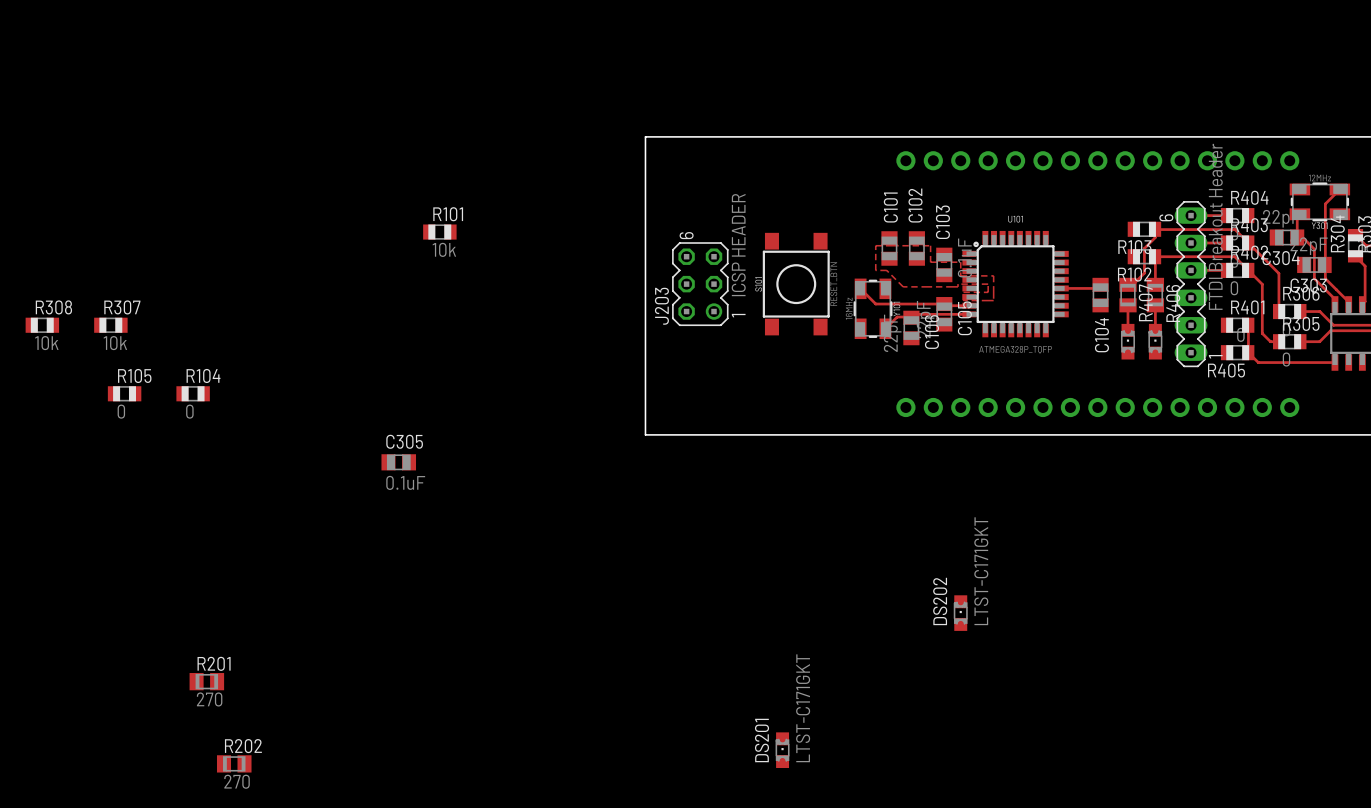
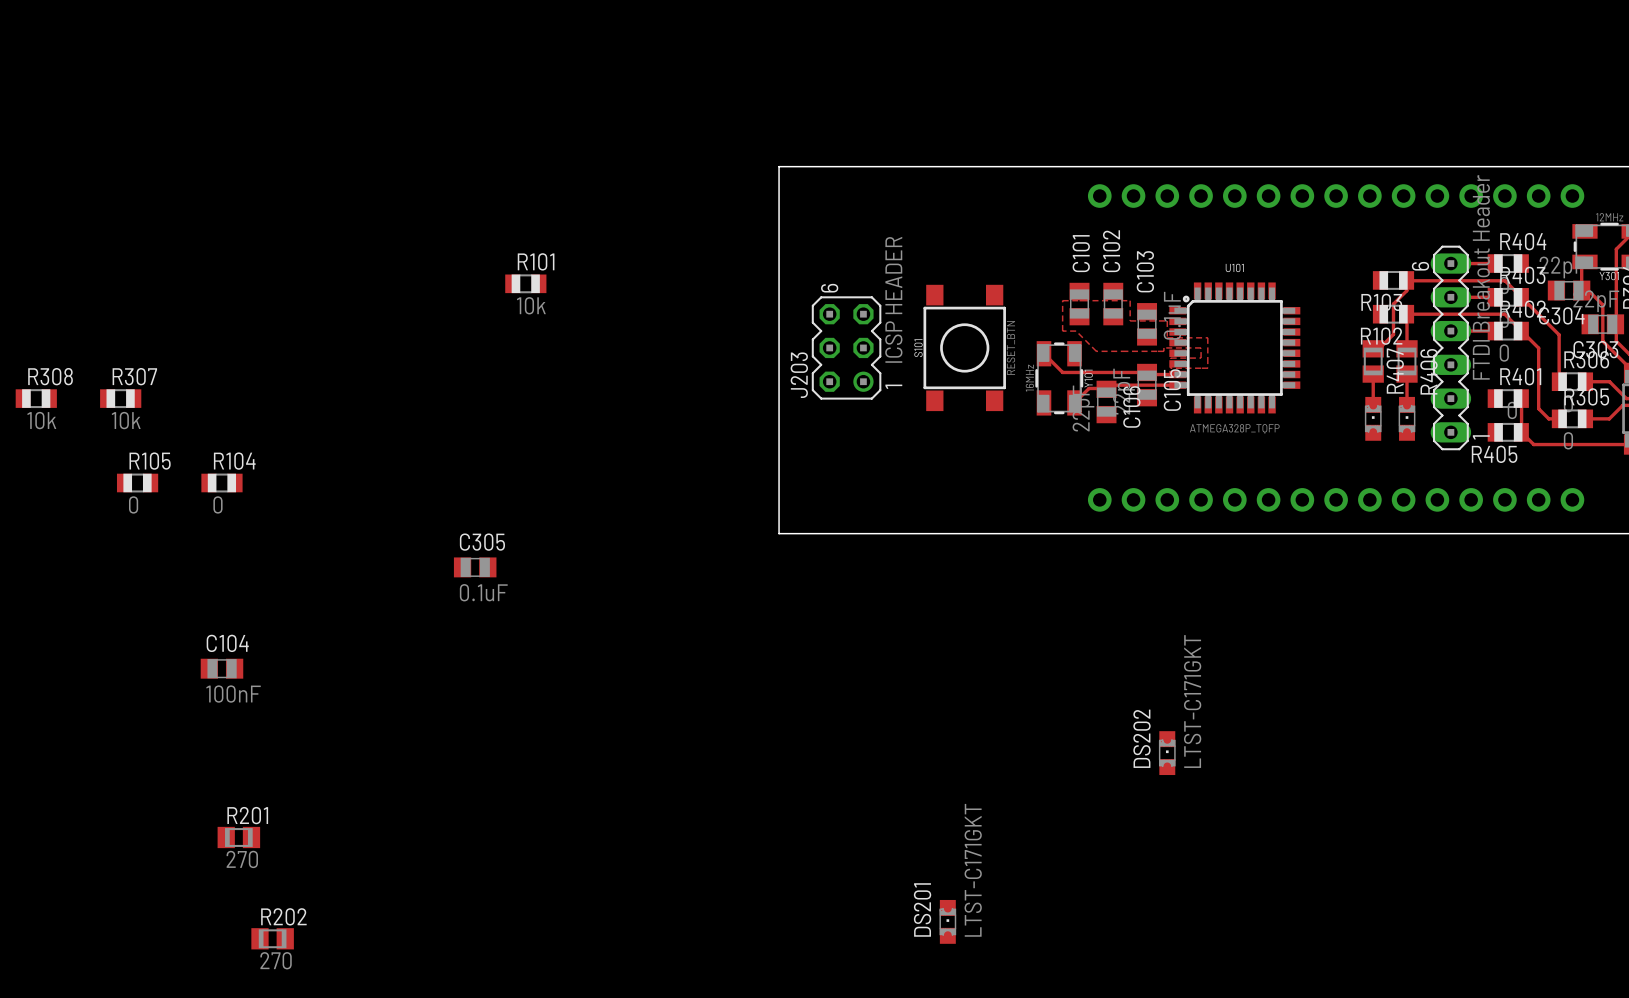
track: (1100, 284) (1096, 288) (1061, 288) -> none
C104 rotation: 0° (1100, 295) -> 90° clockwise (221, 668)
C104 position: (1100, 295) -> (221, 668)
C104 name position: C104 (1101, 335) -> C104 (227, 643)
C104 value: none -> 100nF (233, 694)

